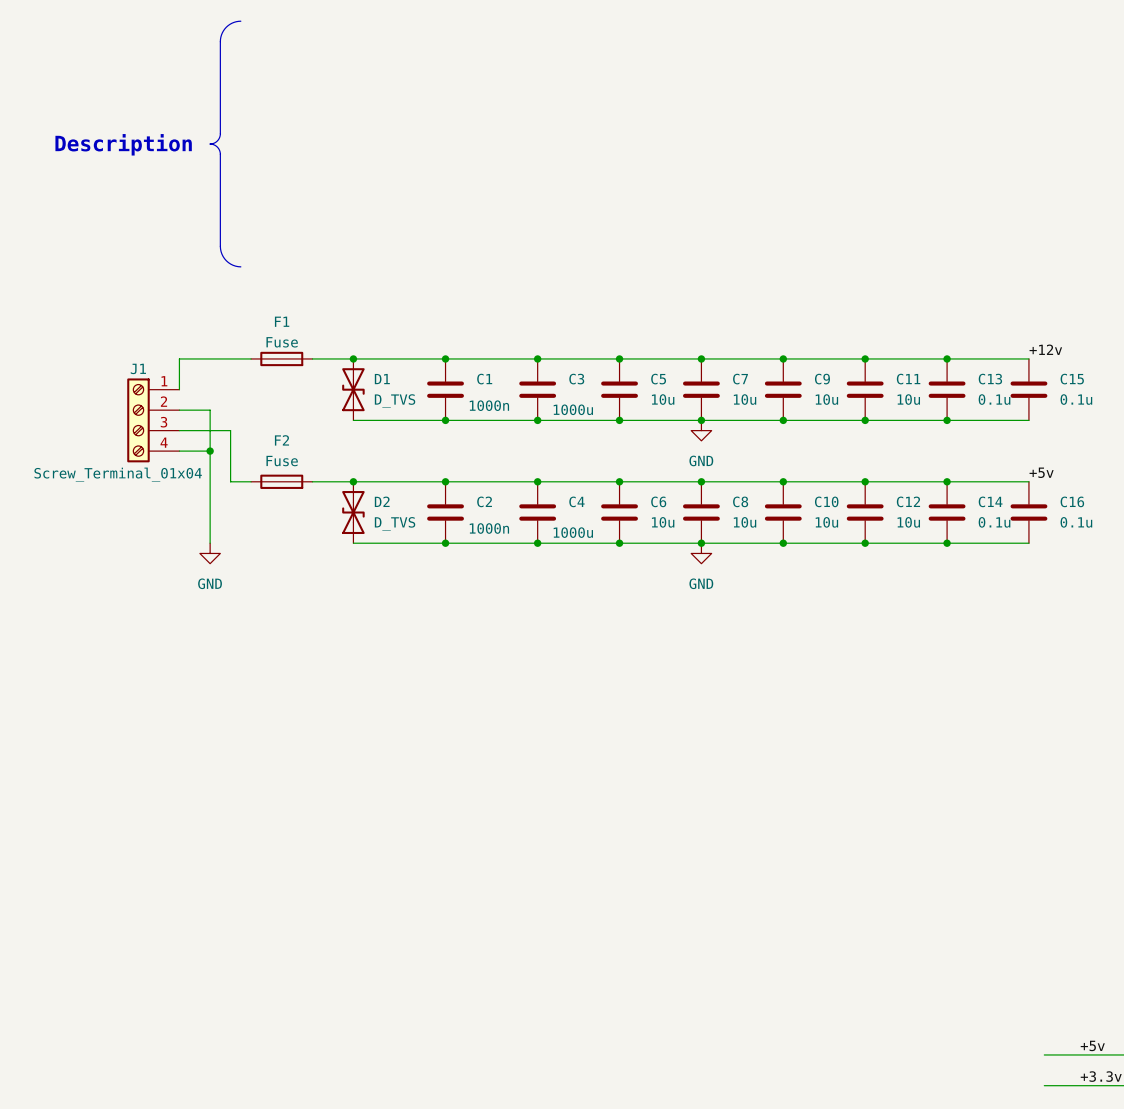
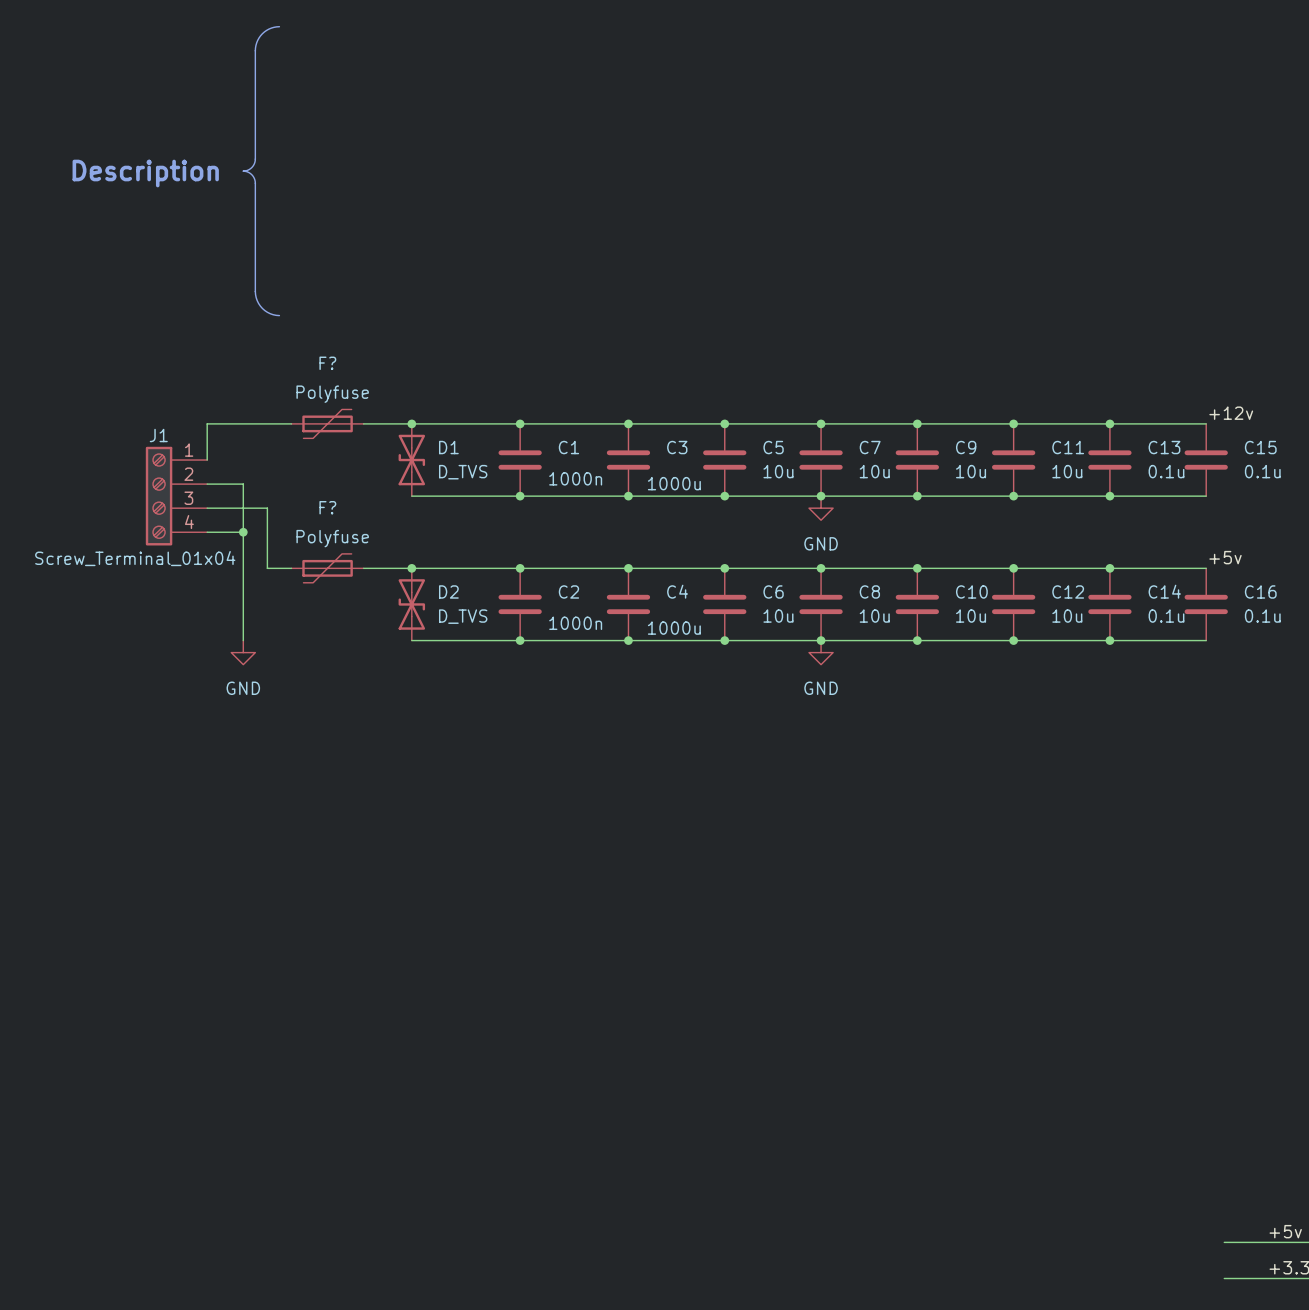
F1: Fuse (281, 358) -> none
F?: none -> Polyfuse (327, 423)
F2: Fuse (281, 481) -> none
F?: none -> Polyfuse (327, 568)

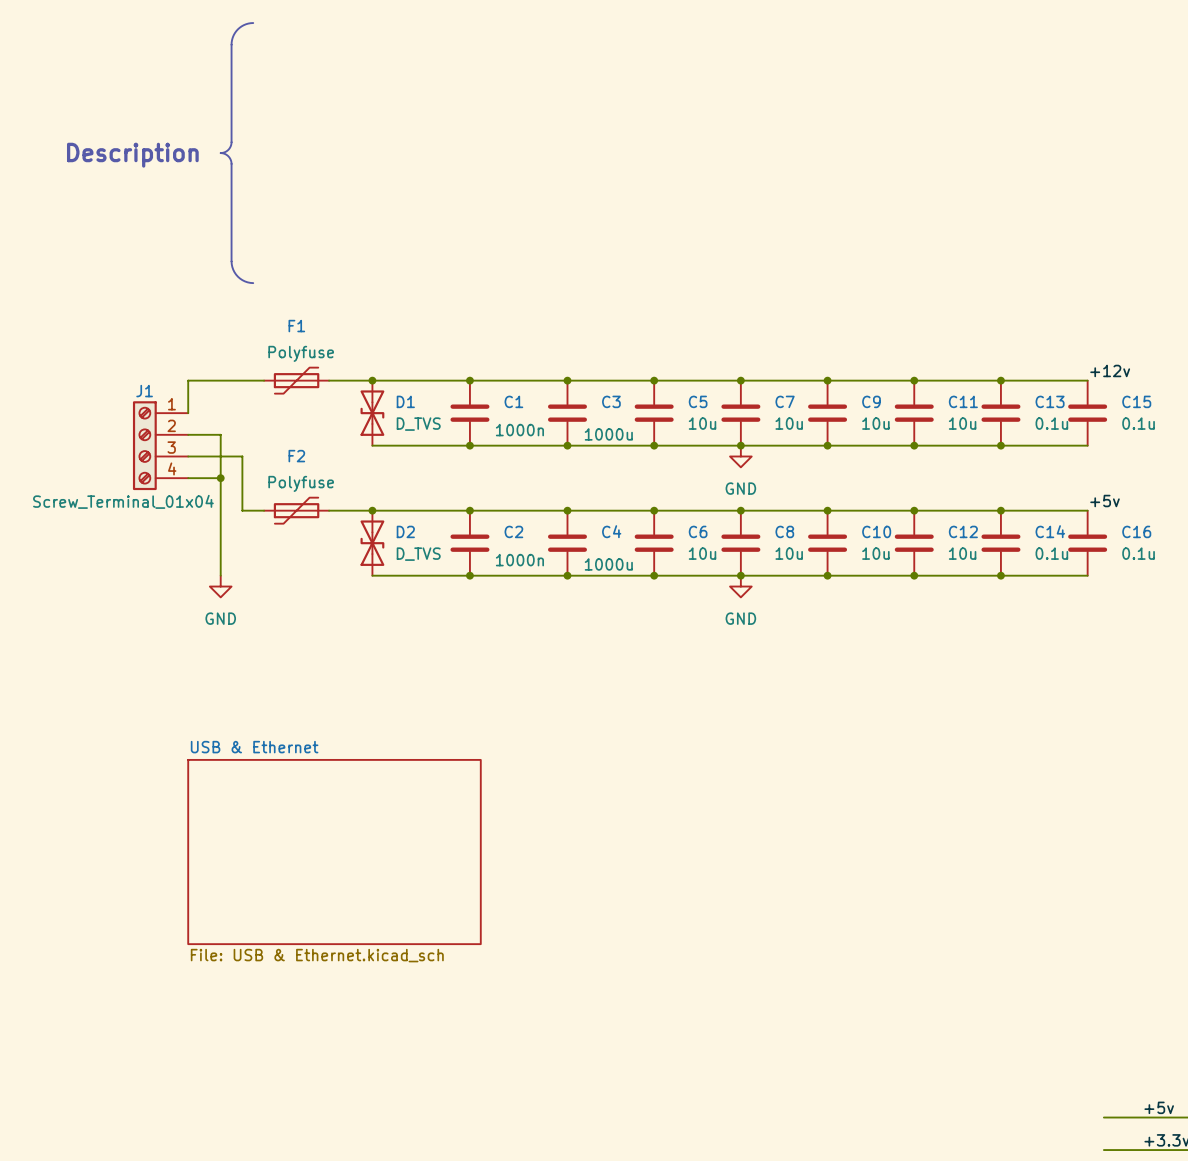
F? name: F? (327, 363) -> F1 (296, 326)
F? name: F? (327, 507) -> F2 (296, 456)
sheet USB & Ethernet: none -> File: USB & Ethernet.kicad_sch (334, 852)

